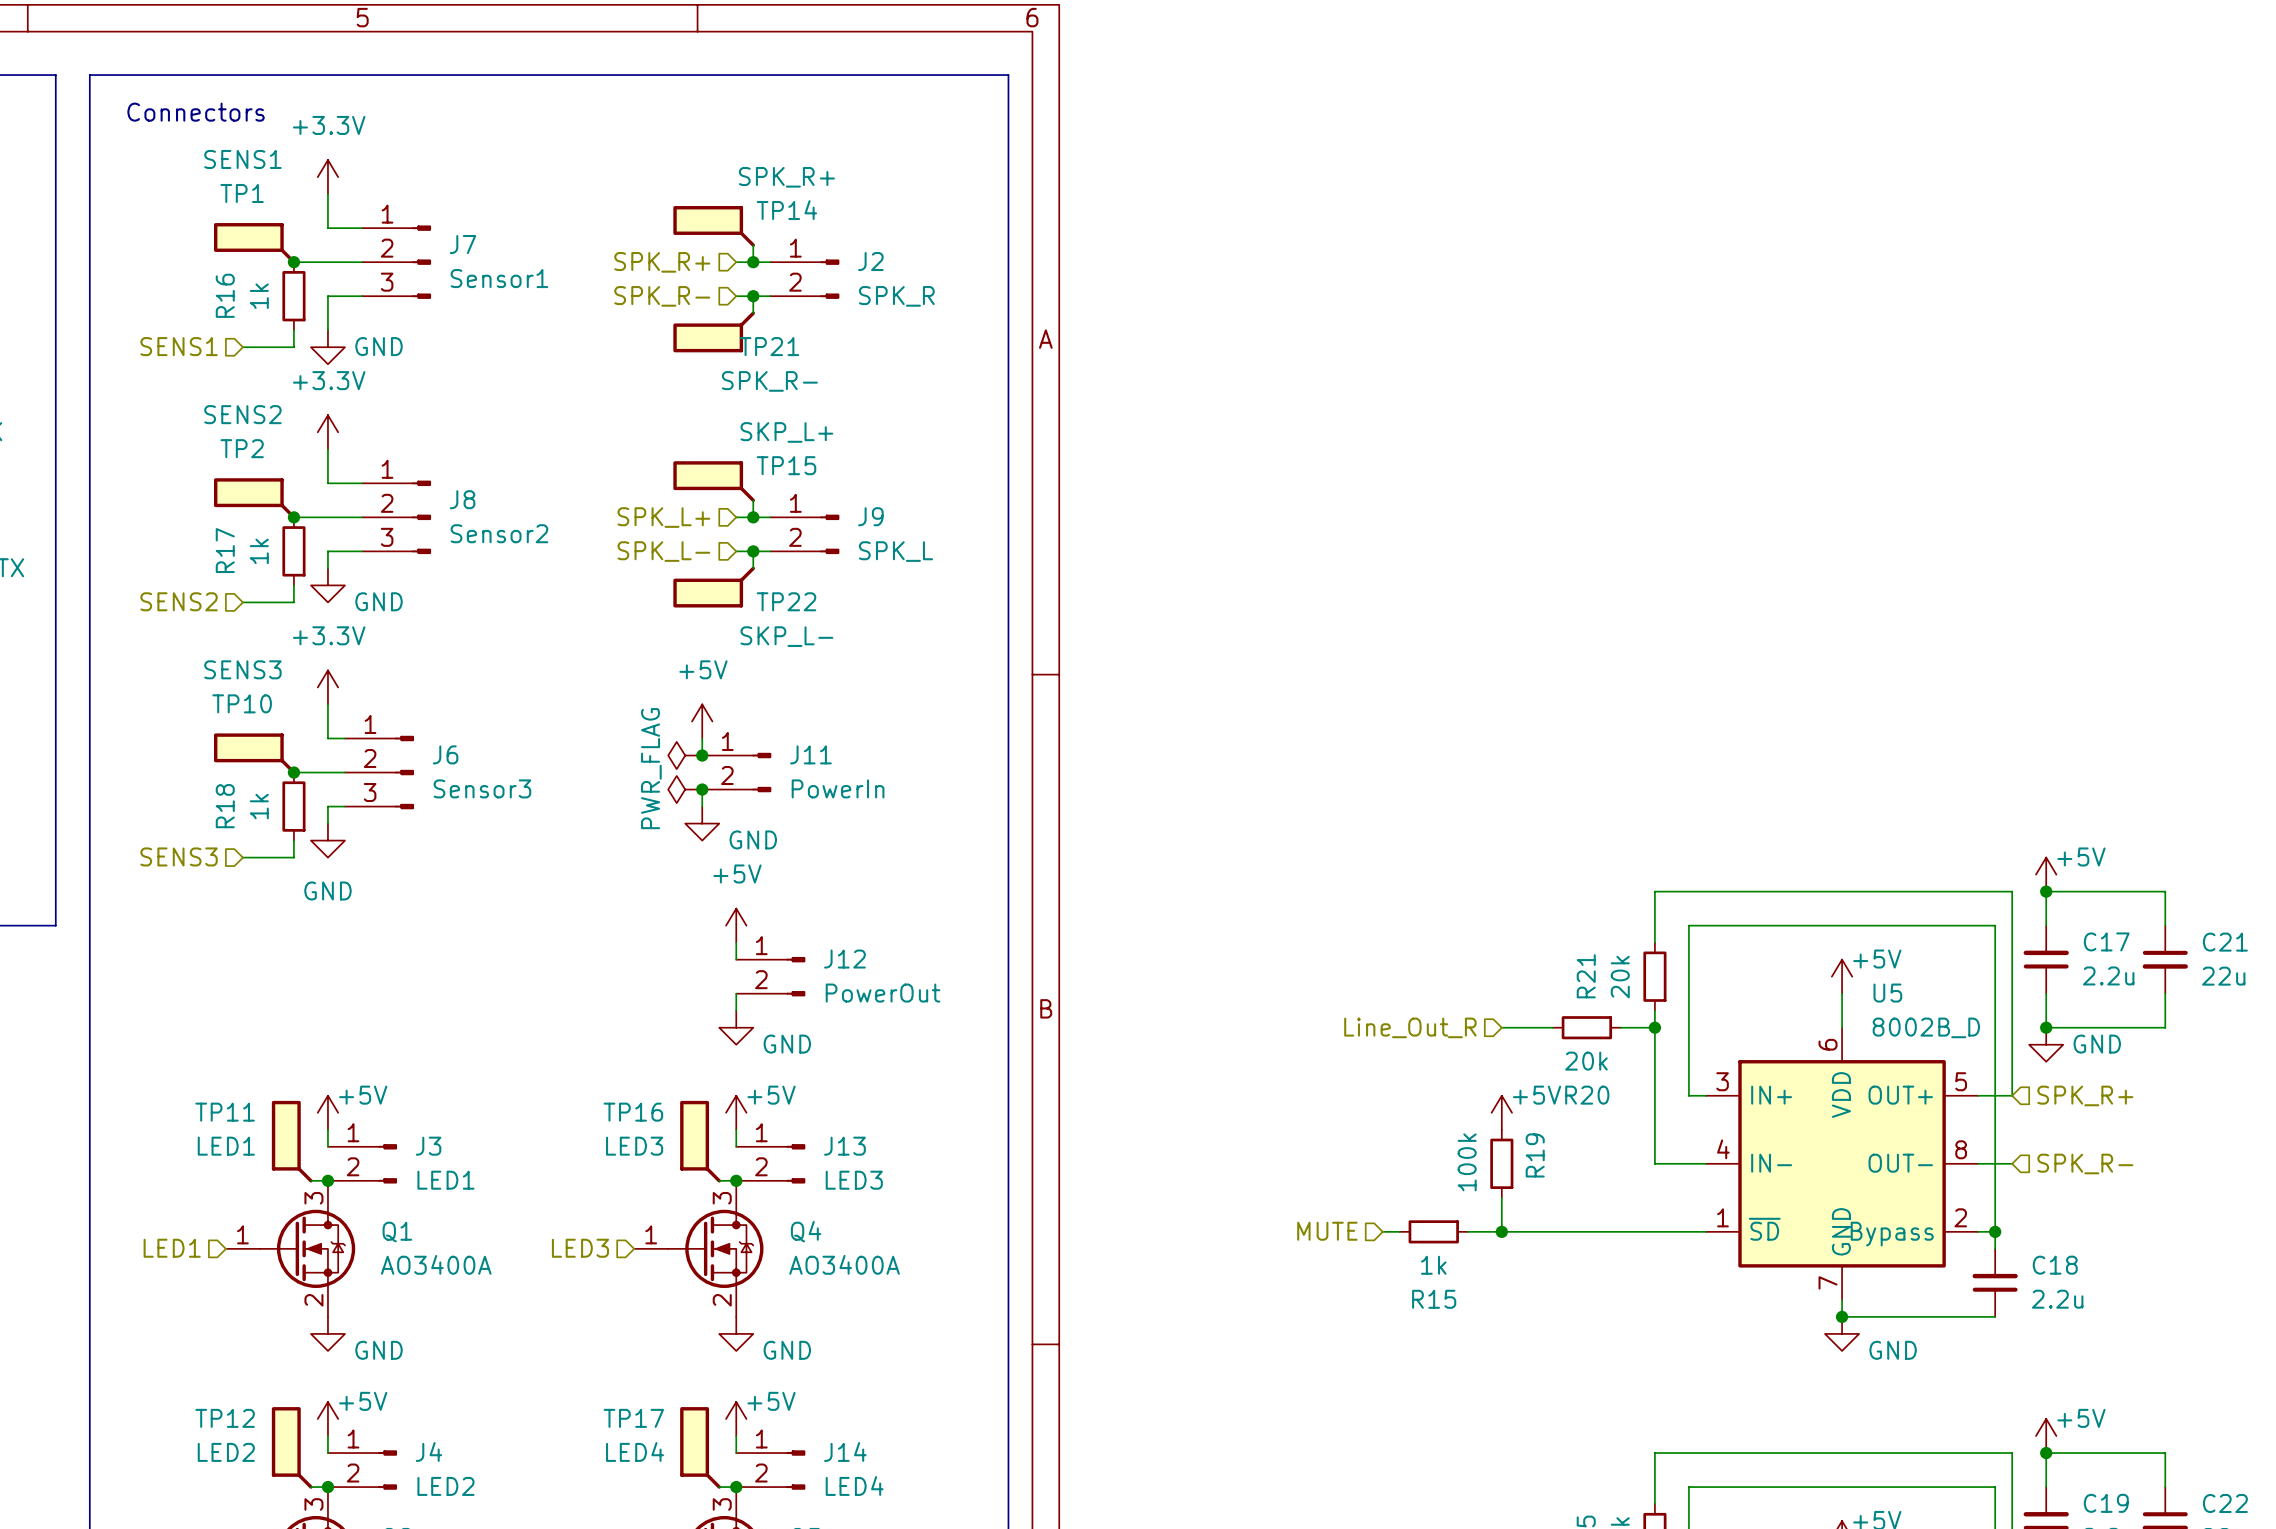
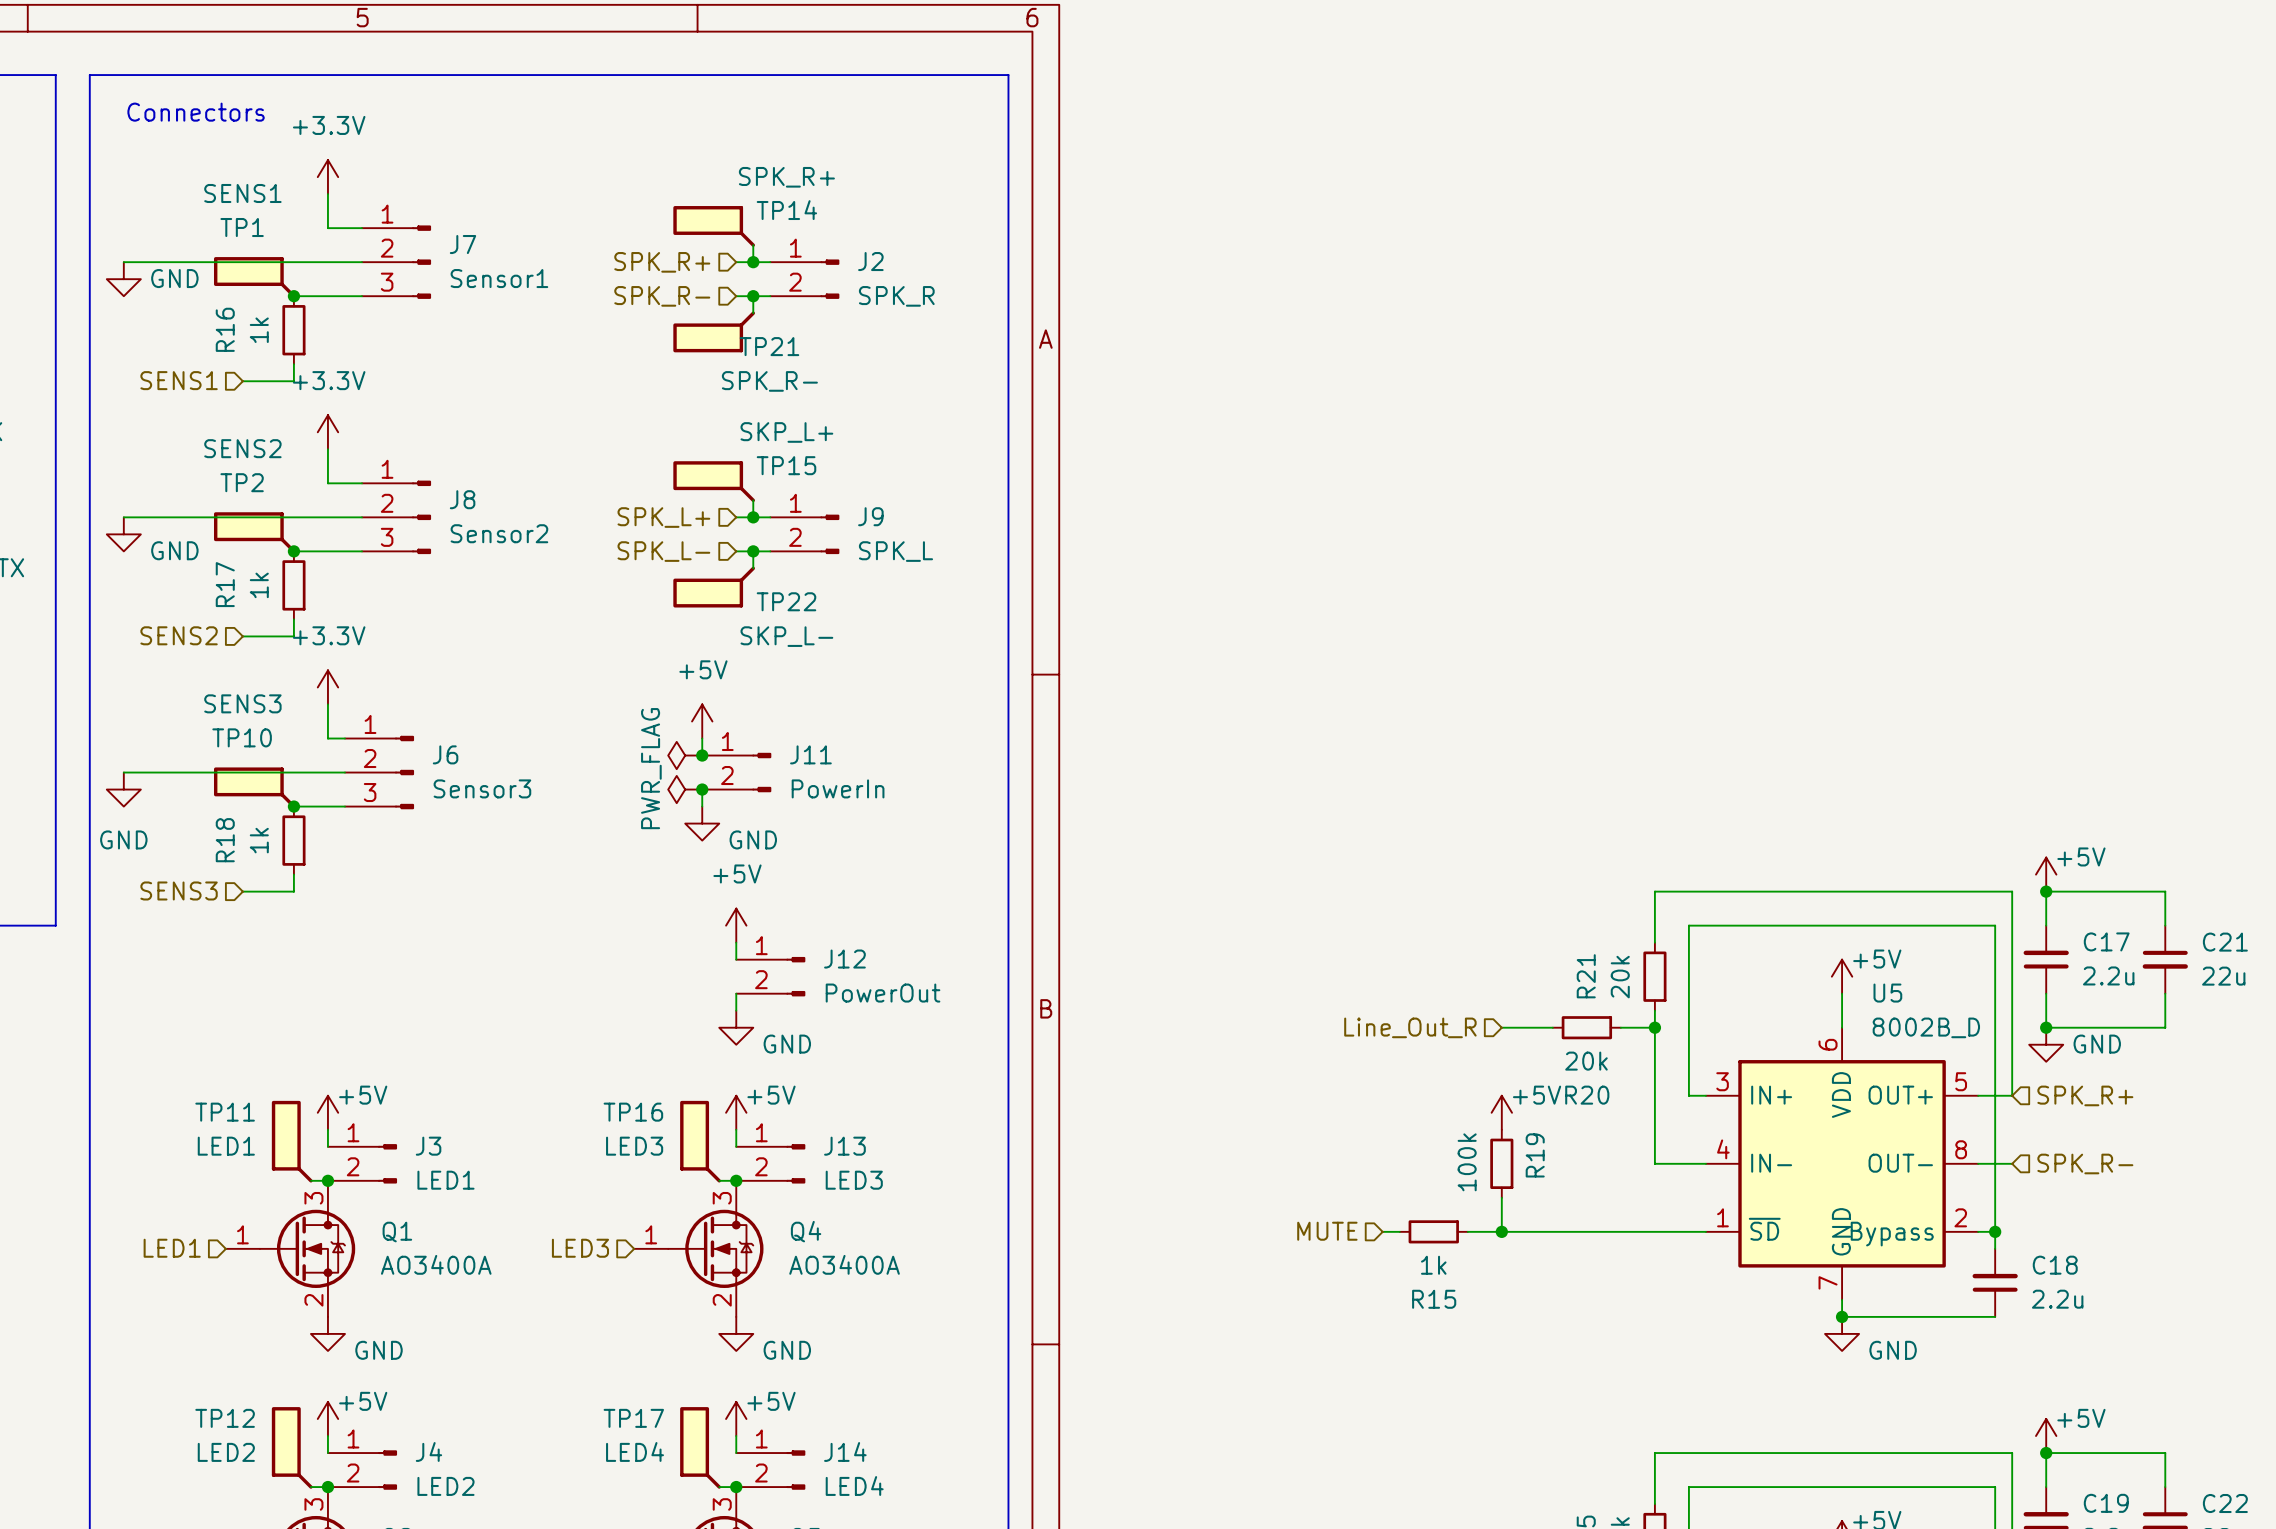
TP1 position: (254, 243) -> (254, 277)
wire: none -> (123, 262) (293, 262)
junction position: (293, 262) -> (293, 296)
power symbol: none -> GND (123, 279)
R16 position: (293, 296) -> (293, 330)
wire: (327, 296) (327, 330) -> (327, 296) (293, 296)
wire: (293, 330) (293, 347) (242, 347) -> (293, 364) (293, 381) (242, 381)
hierarchical label position: SENS1 (179, 346) -> SENS1 (179, 380)
power symbol: GND (327, 347) -> none
TP2 position: (254, 498) -> (254, 532)
wire: none -> (123, 517) (293, 517)
junction position: (293, 517) -> (293, 551)
power symbol: none -> GND (123, 534)
R17 position: (293, 551) -> (293, 585)
wire: (327, 551) (327, 568) -> (327, 551) (293, 551)
wire: (293, 585) (293, 602) (242, 602) -> (293, 619) (293, 636) (242, 636)
power symbol: GND (327, 585) -> none
hierarchical label position: SENS2 (179, 601) -> SENS2 (179, 635)
TP10 position: (254, 753) -> (254, 787)
wire: none -> (123, 772) (293, 772)
junction position: (293, 772) -> (293, 806)
power symbol: none -> GND (123, 789)
R18 position: (293, 806) -> (293, 840)
wire: (327, 806) (327, 823) -> (327, 806) (293, 806)
wire: (293, 840) (293, 857) (242, 857) -> (293, 874) (293, 891) (242, 891)
power symbol: GND (327, 840) -> none
hierarchical label position: SENS3 (179, 856) -> SENS3 (179, 890)

